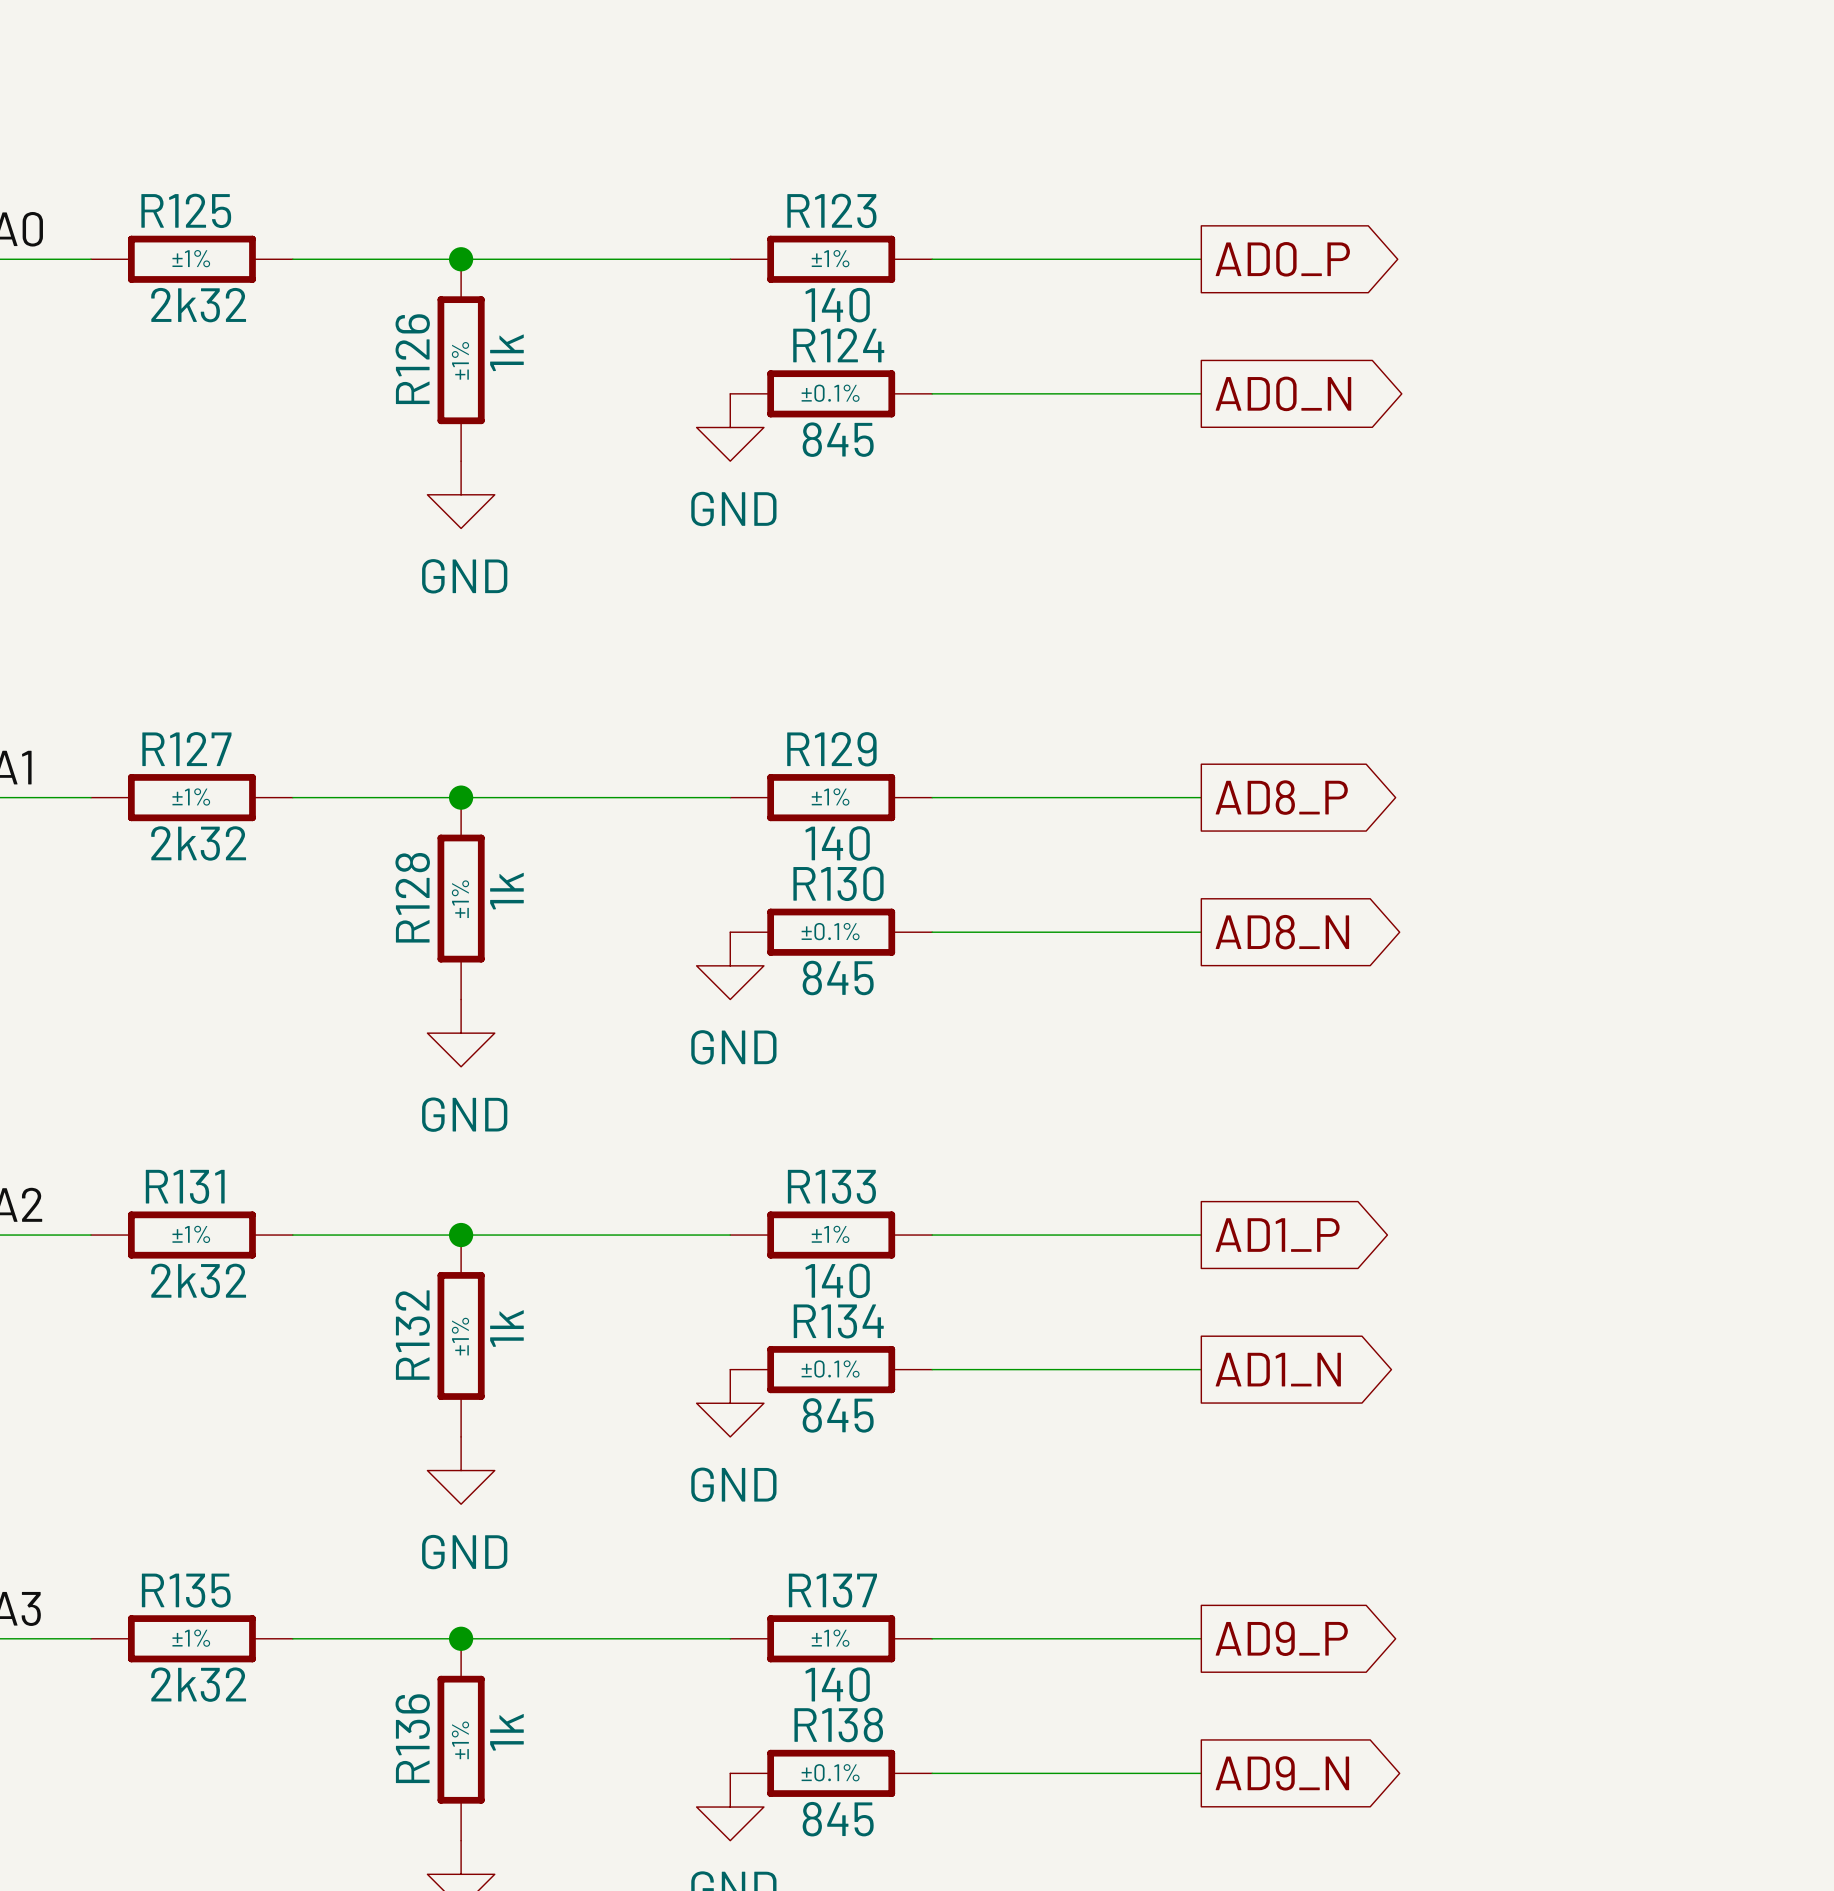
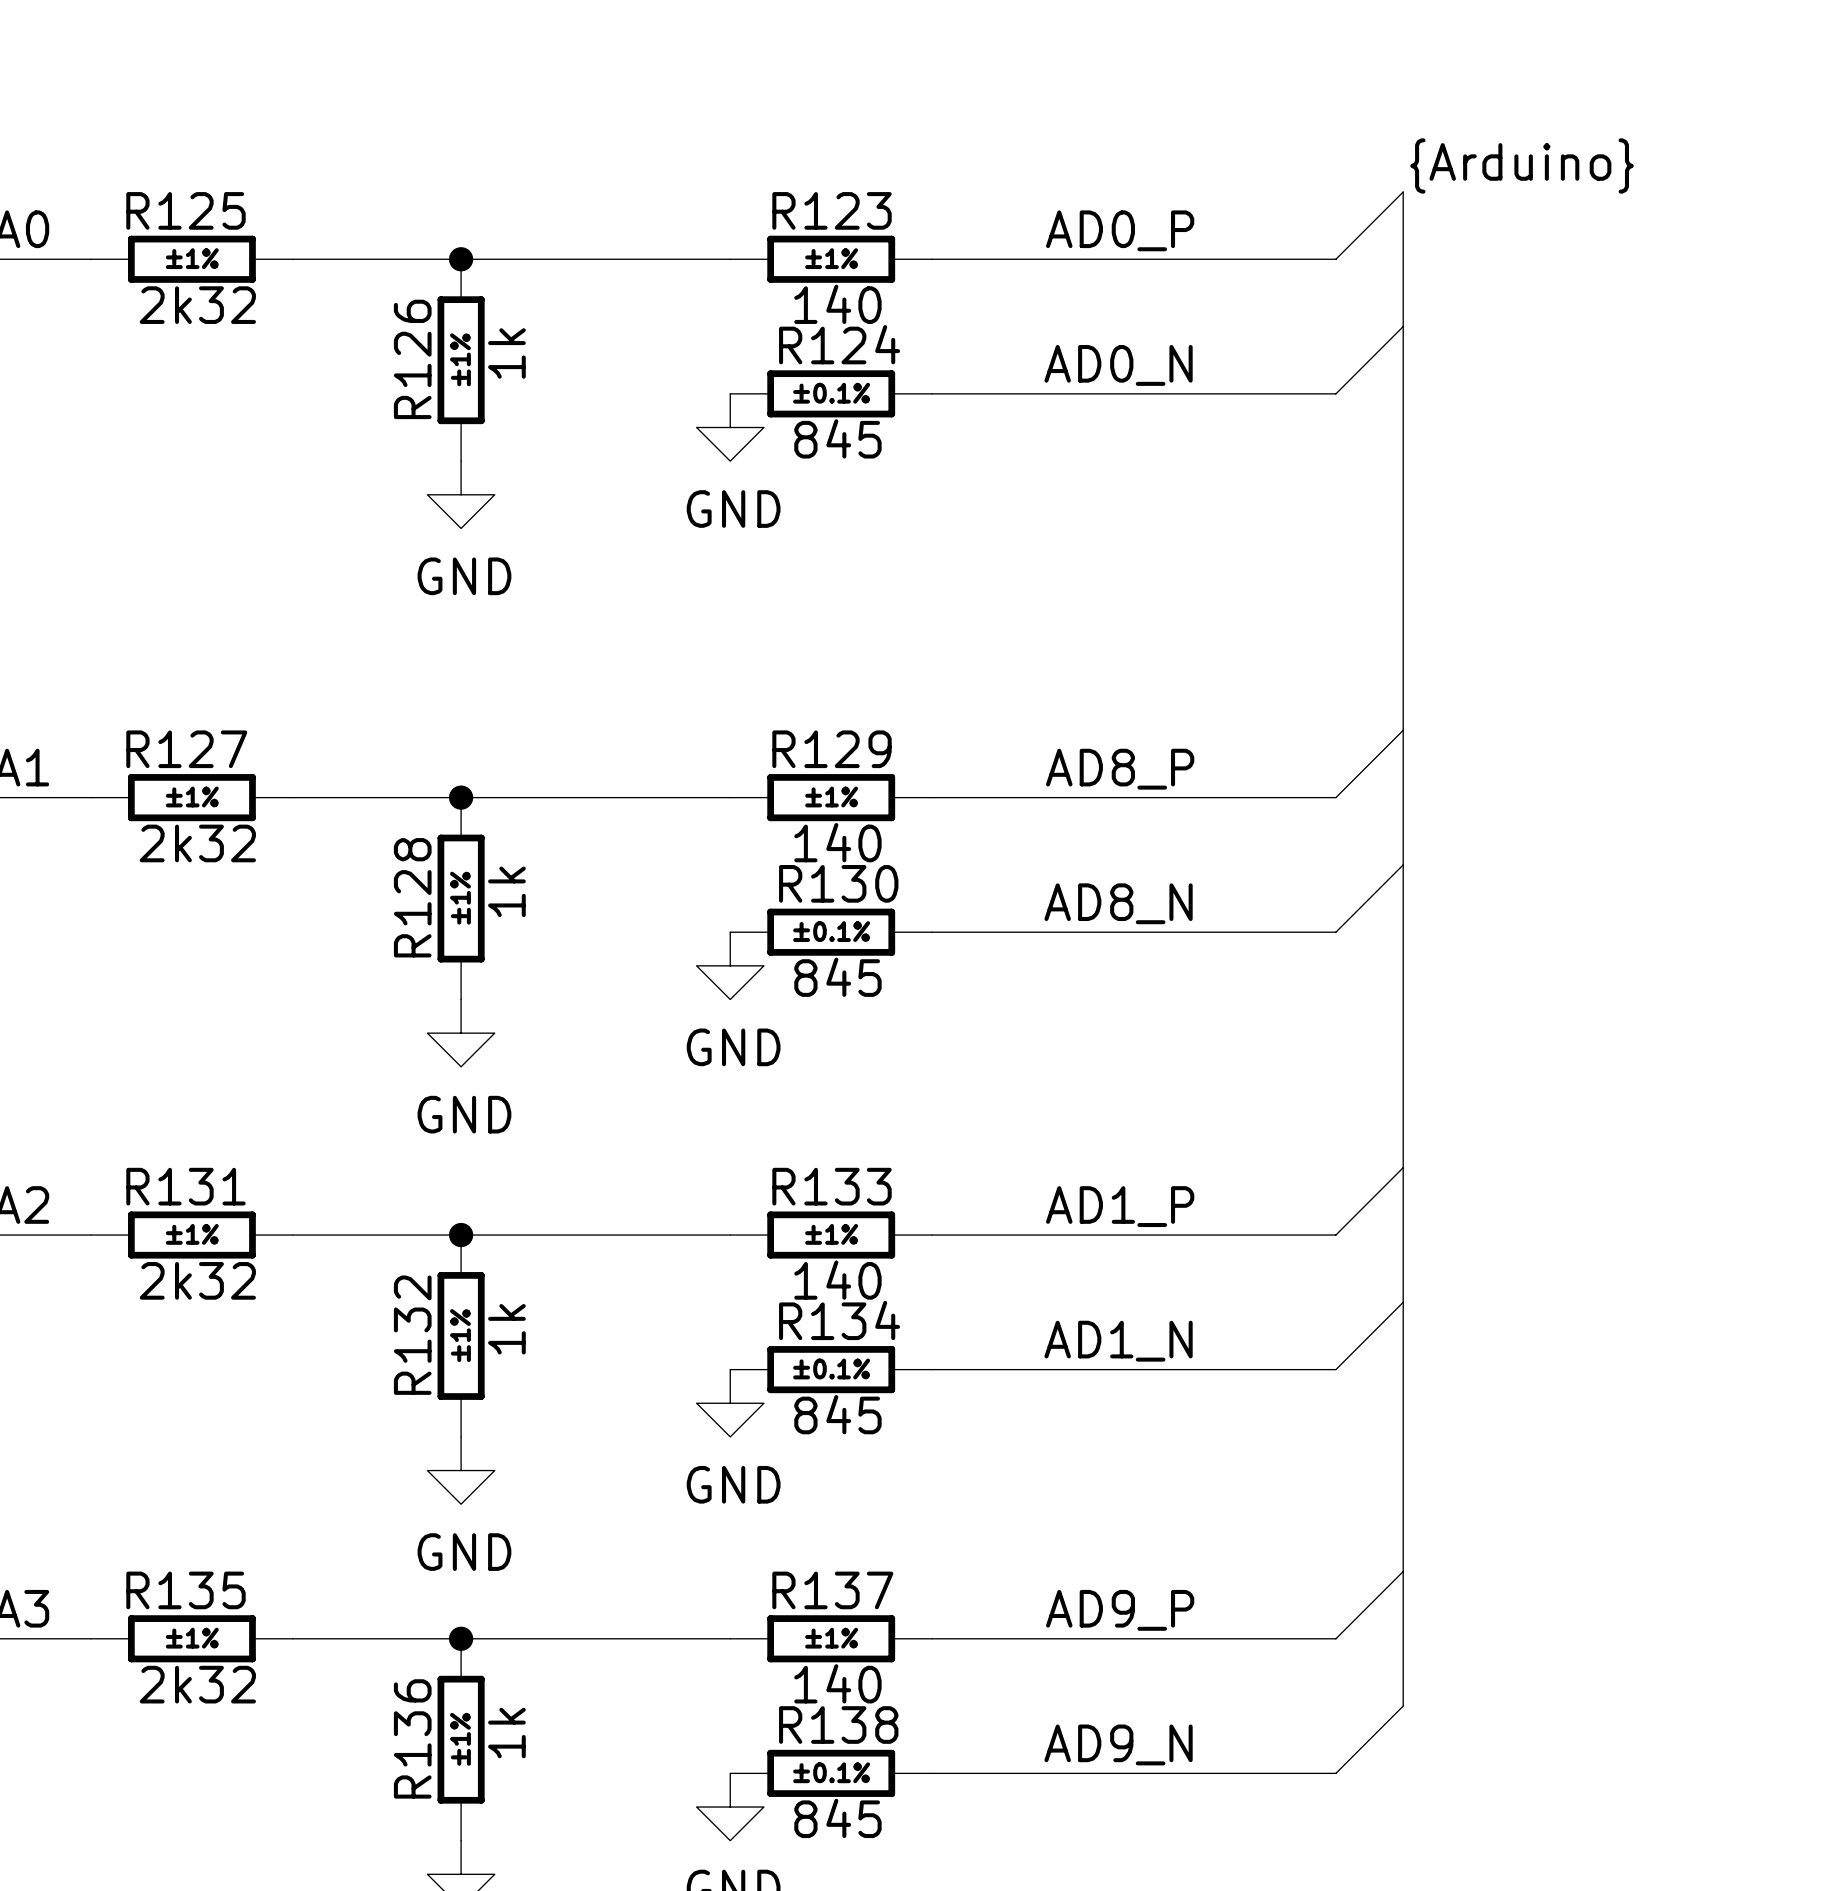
label: none -> {Arduino} (1522, 165)
wire: none -> (1403, 191) (1335, 259) (1201, 259)
bus: none -> (1403, 191) (1403, 1706)
label: none -> AD0_P (1120, 230)
global label: AD0_P (1282, 259) -> none
wire: none -> (1403, 326) (1335, 393) (1201, 393)
label: none -> AD0_N (1118, 365)
global label: AD0_N (1283, 393) -> none
wire: none -> (1403, 730) (1335, 797) (1201, 797)
label: none -> AD8_P (1120, 769)
global label: AD8_P (1281, 797) -> none
wire: none -> (1403, 864) (1335, 932) (1201, 932)
label: none -> AD8_N (1118, 903)
global label: AD8_N (1282, 932) -> none
wire: none -> (1403, 1167) (1335, 1235) (1201, 1235)
label: none -> AD1_P (1120, 1206)
global label: AD1_P (1277, 1235) -> none
wire: none -> (1403, 1302) (1335, 1369) (1201, 1369)
label: none -> AD1_N (1118, 1341)
global label: AD1_N (1278, 1369) -> none
wire: none -> (1403, 1571) (1335, 1638) (1201, 1638)
label: none -> AD9_P (1120, 1610)
global label: AD9_P (1281, 1638) -> none
wire: none -> (1403, 1706) (1335, 1773) (1201, 1773)
label: none -> AD9_N (1118, 1744)
global label: AD9_N (1282, 1773) -> none

